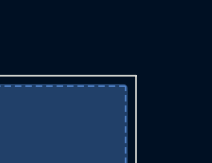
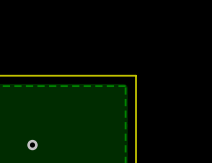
via: none -> (32, 145)

